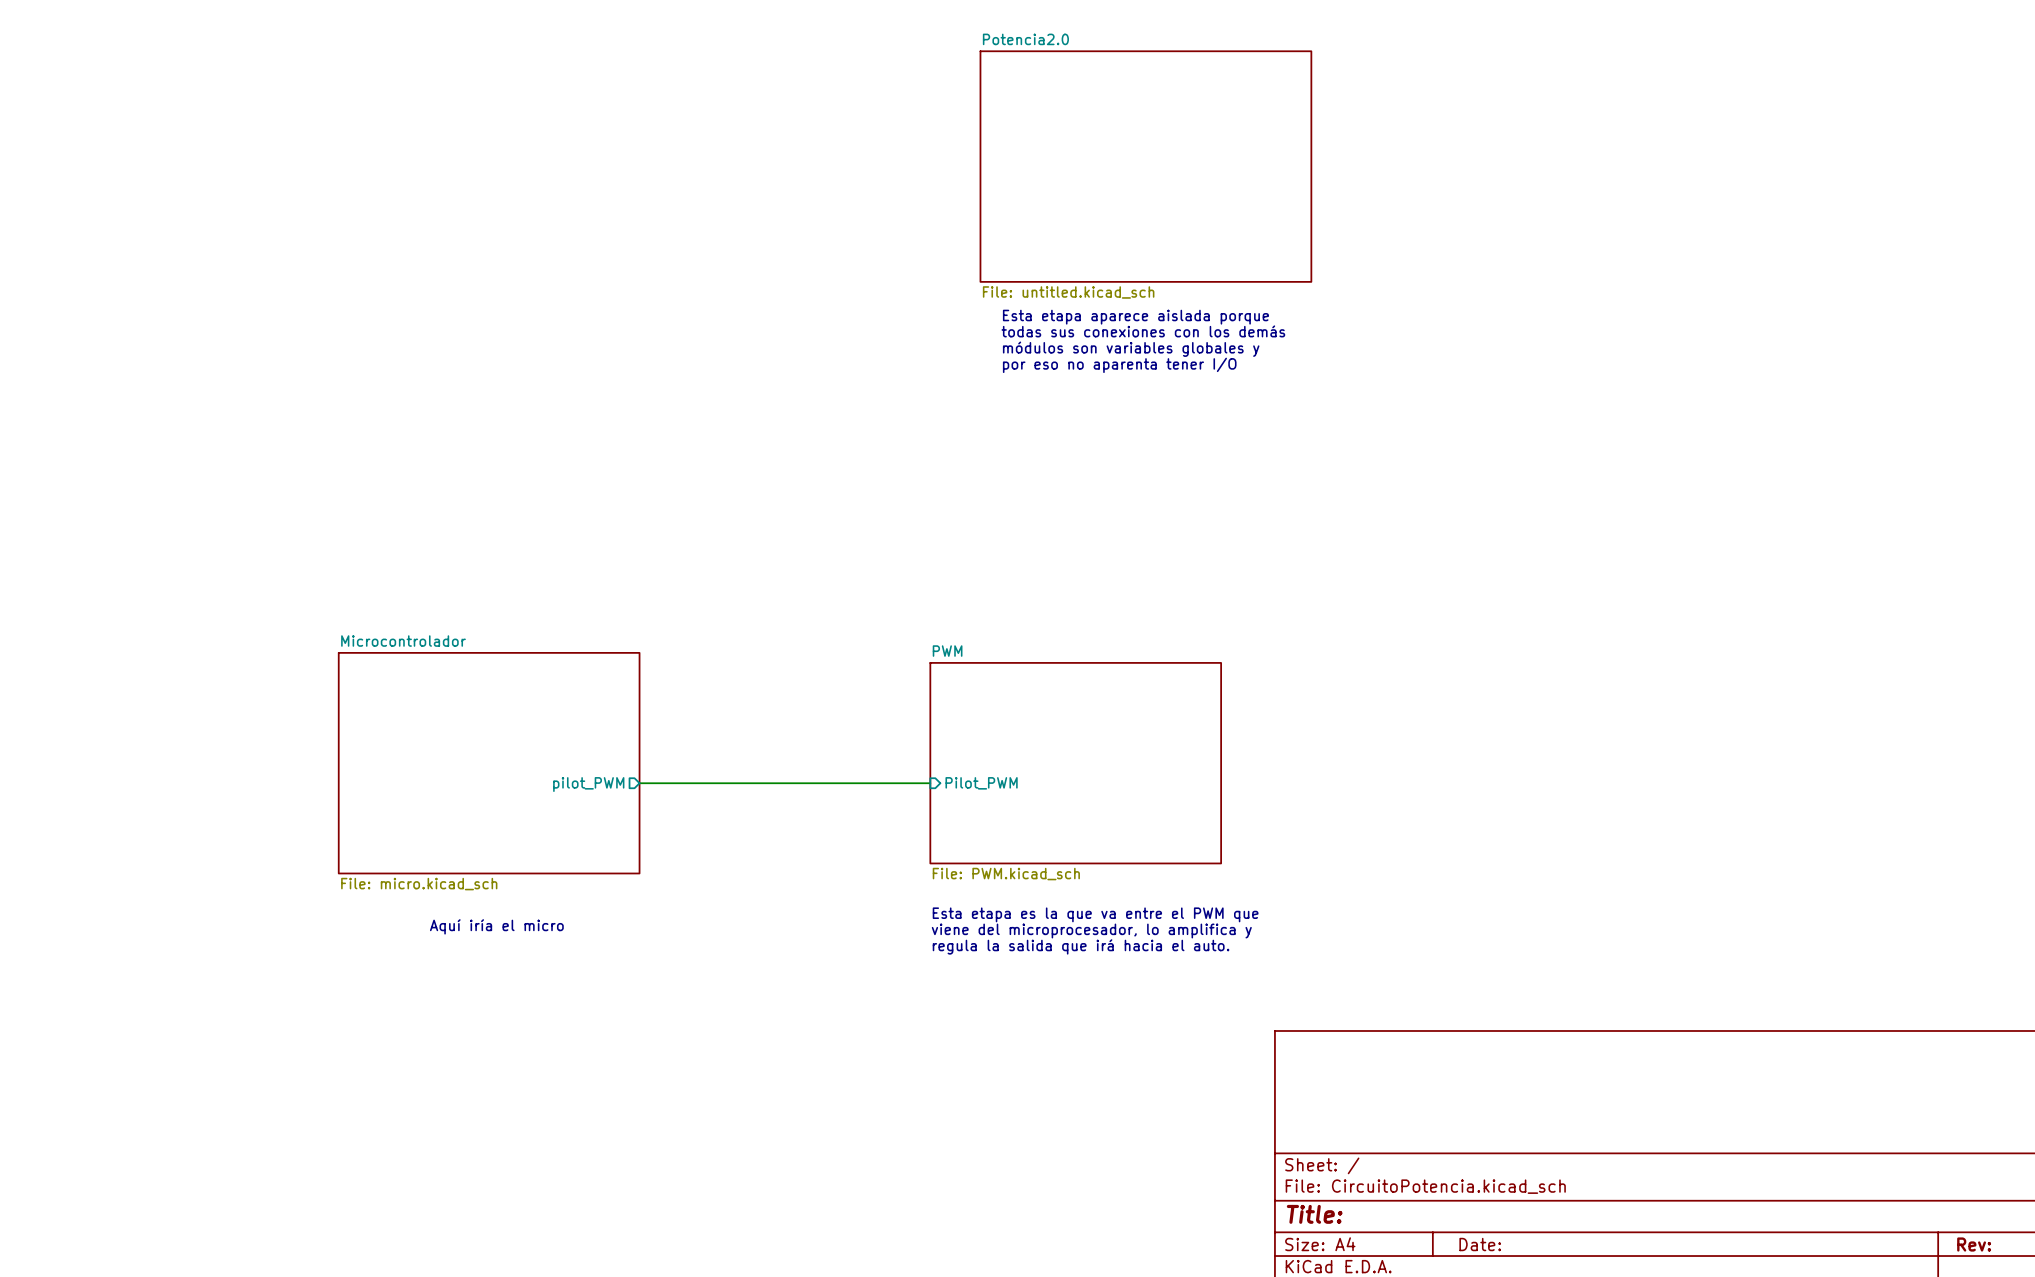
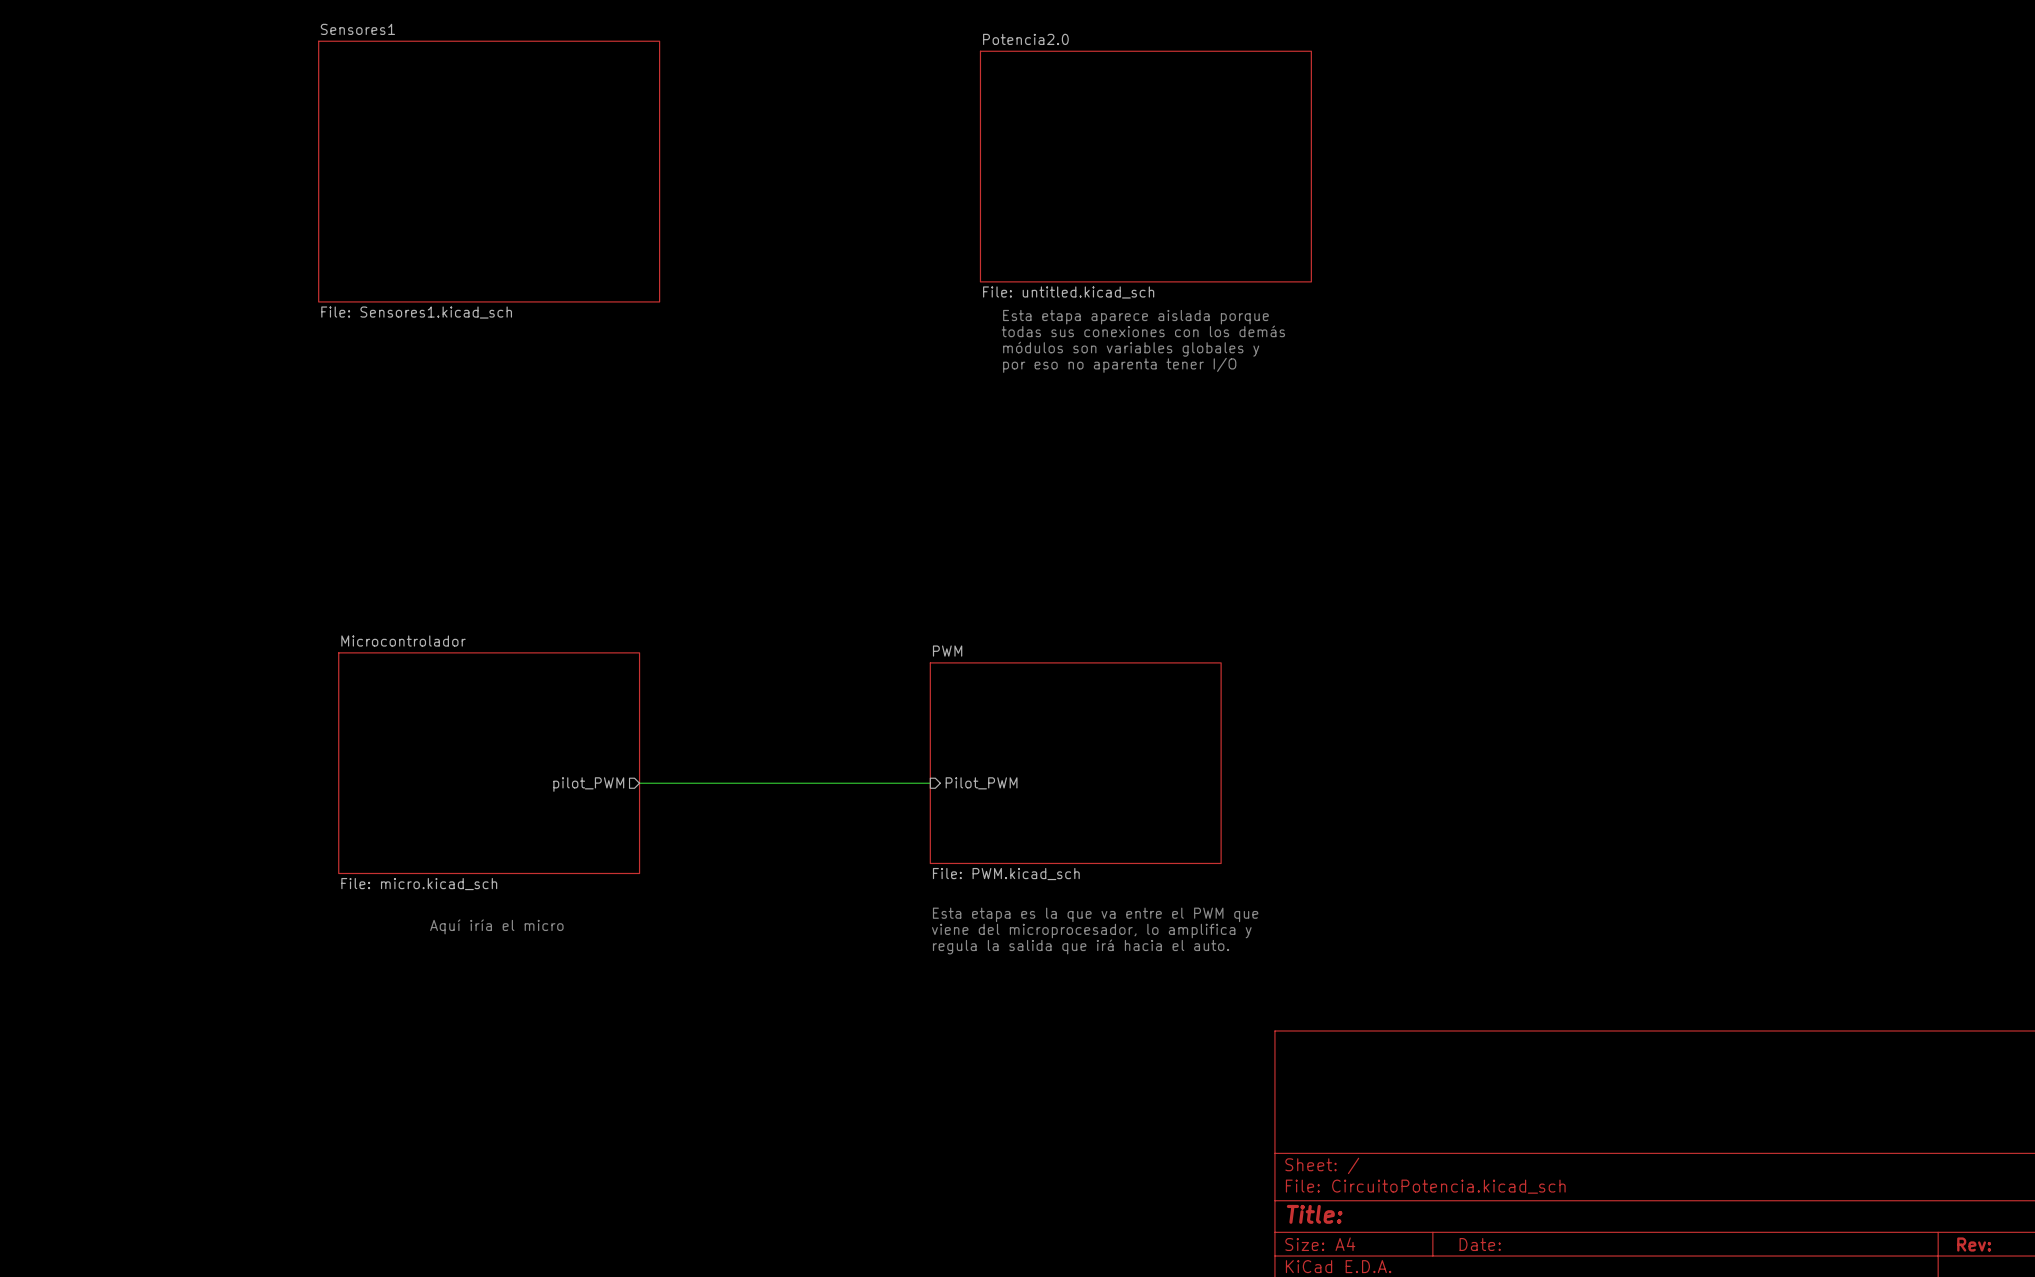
sheet Sensores1: none -> File: Sensores1.kicad_sch (489, 171)

